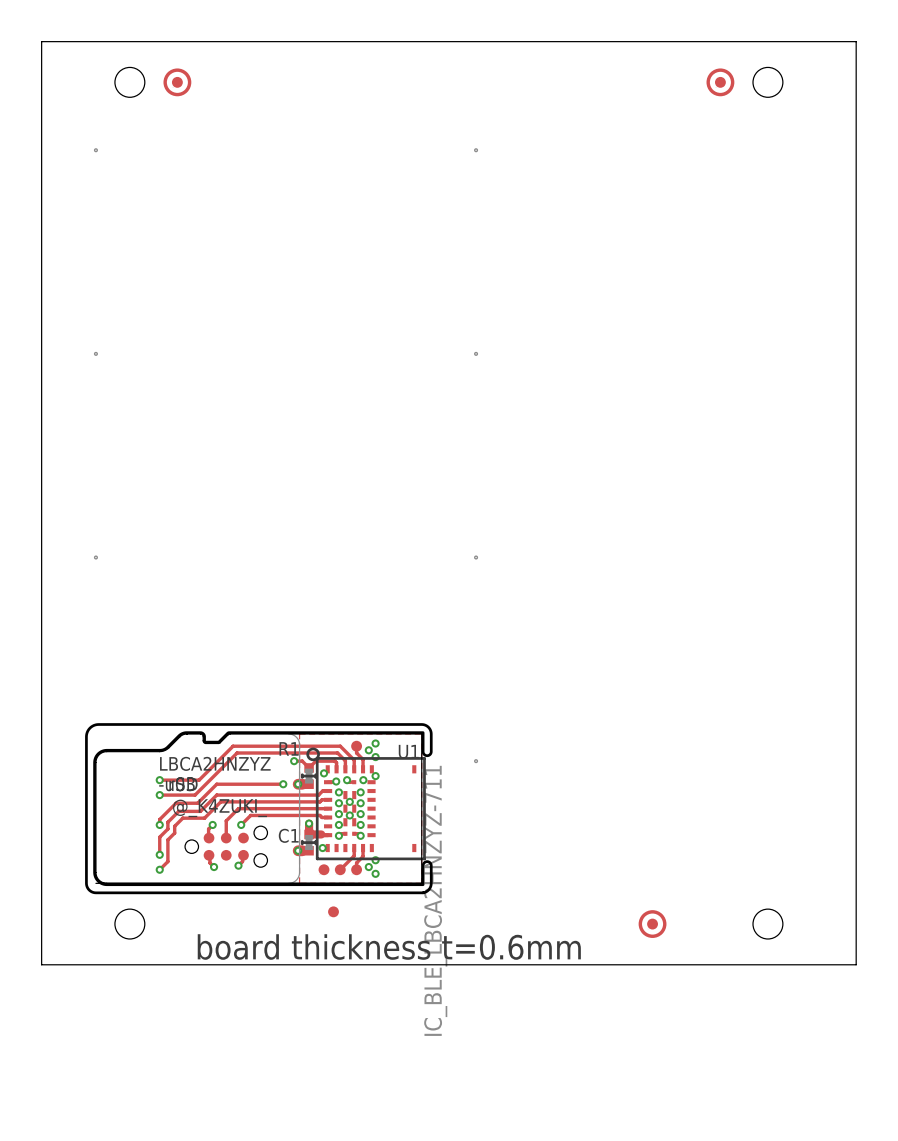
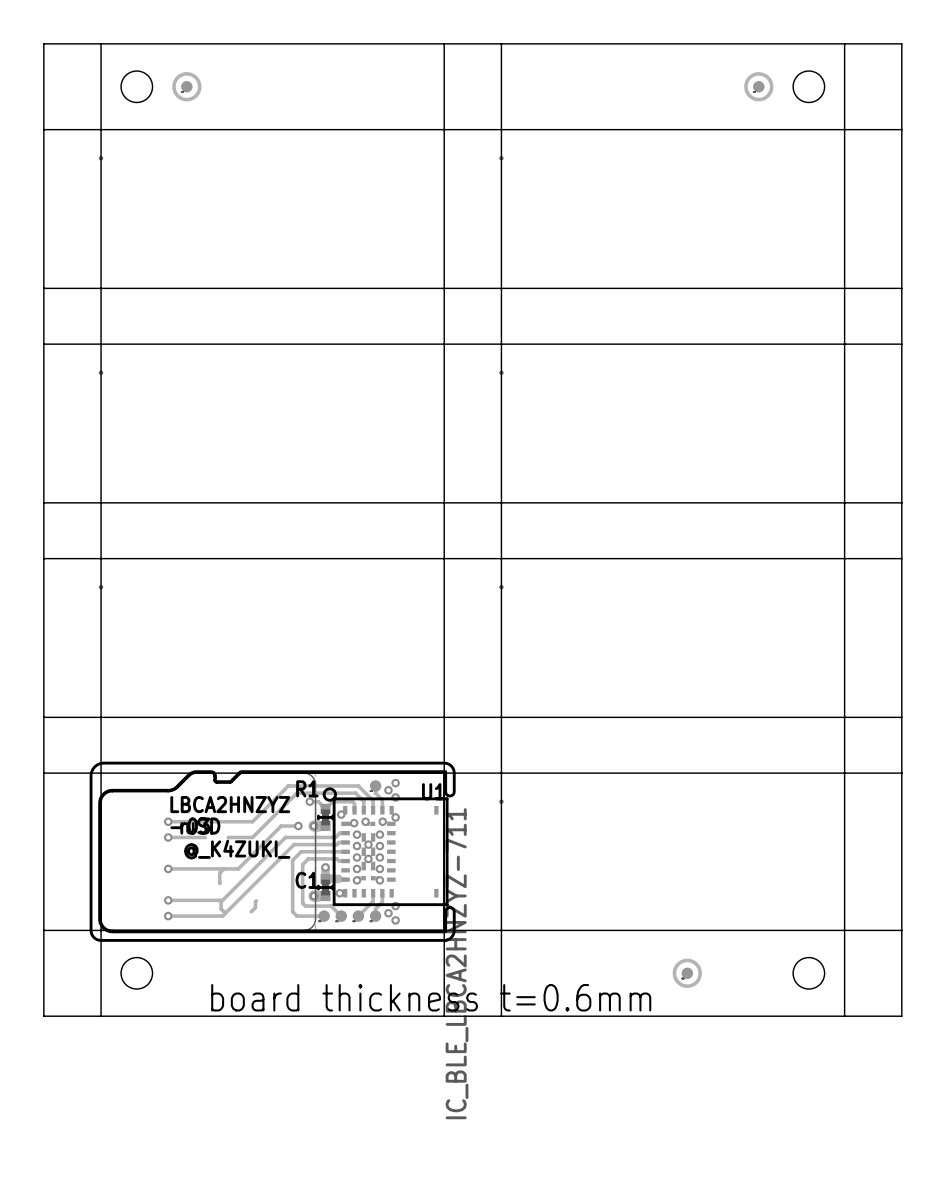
board edge: none -> (101, 43) (101, 1016)
board edge: none -> (444, 43) (444, 1016)
board edge: none -> (501, 43) (501, 1016)
board edge: none -> (844, 43) (844, 1016)
board edge: none -> (43, 129) (901, 129)
board edge: none -> (43, 288) (901, 288)
board edge: none -> (43, 344) (901, 344)
board edge: none -> (43, 502) (901, 502)
board edge: none -> (43, 558) (901, 558)
board edge: none -> (43, 717) (901, 717)
board edge: none -> (43, 773) (901, 773)
track: (273, 746) (233, 746) (199, 780) -> (288, 785) (252, 821) (209, 821)
track: (281, 753) (237, 753) (195, 795) -> (296, 793) (252, 837)
track: (266, 784) (216, 784) (197, 803) (176, 803) (159, 819) (159, 824) -> (281, 826) (238, 868) (168, 868)
track: (216, 795) (200, 811) (178, 811) (167, 822) (167, 829) (159, 837) (159, 854) -> (254, 868) (222, 900) (168, 900)
track: (239, 795) (271, 795) -> (264, 858) (285, 837)
track: (279, 801) (220, 801) (204, 818) (182, 818) (174, 826) (174, 833) (167, 839) (167, 861) (159, 869) -> (294, 844) (222, 916) (168, 916)
track: (286, 808) (238, 808) (226, 820) (226, 838) -> (301, 851) (292, 860) (292, 911) (296, 916) (324, 916)
track: (250, 815) (292, 815) -> (341, 916) (331, 906) (305, 906) (302, 903) (302, 864) (308, 858)
via: (212, 824) -> none
via: (241, 824) -> none
part: (226, 846) -> none
via: (238, 865) -> none
via: (214, 867) -> none
board edge: none -> (43, 930) (101, 930)
board edge: none -> (444, 930) (901, 930)
part position: (333, 911) -> (324, 916)

